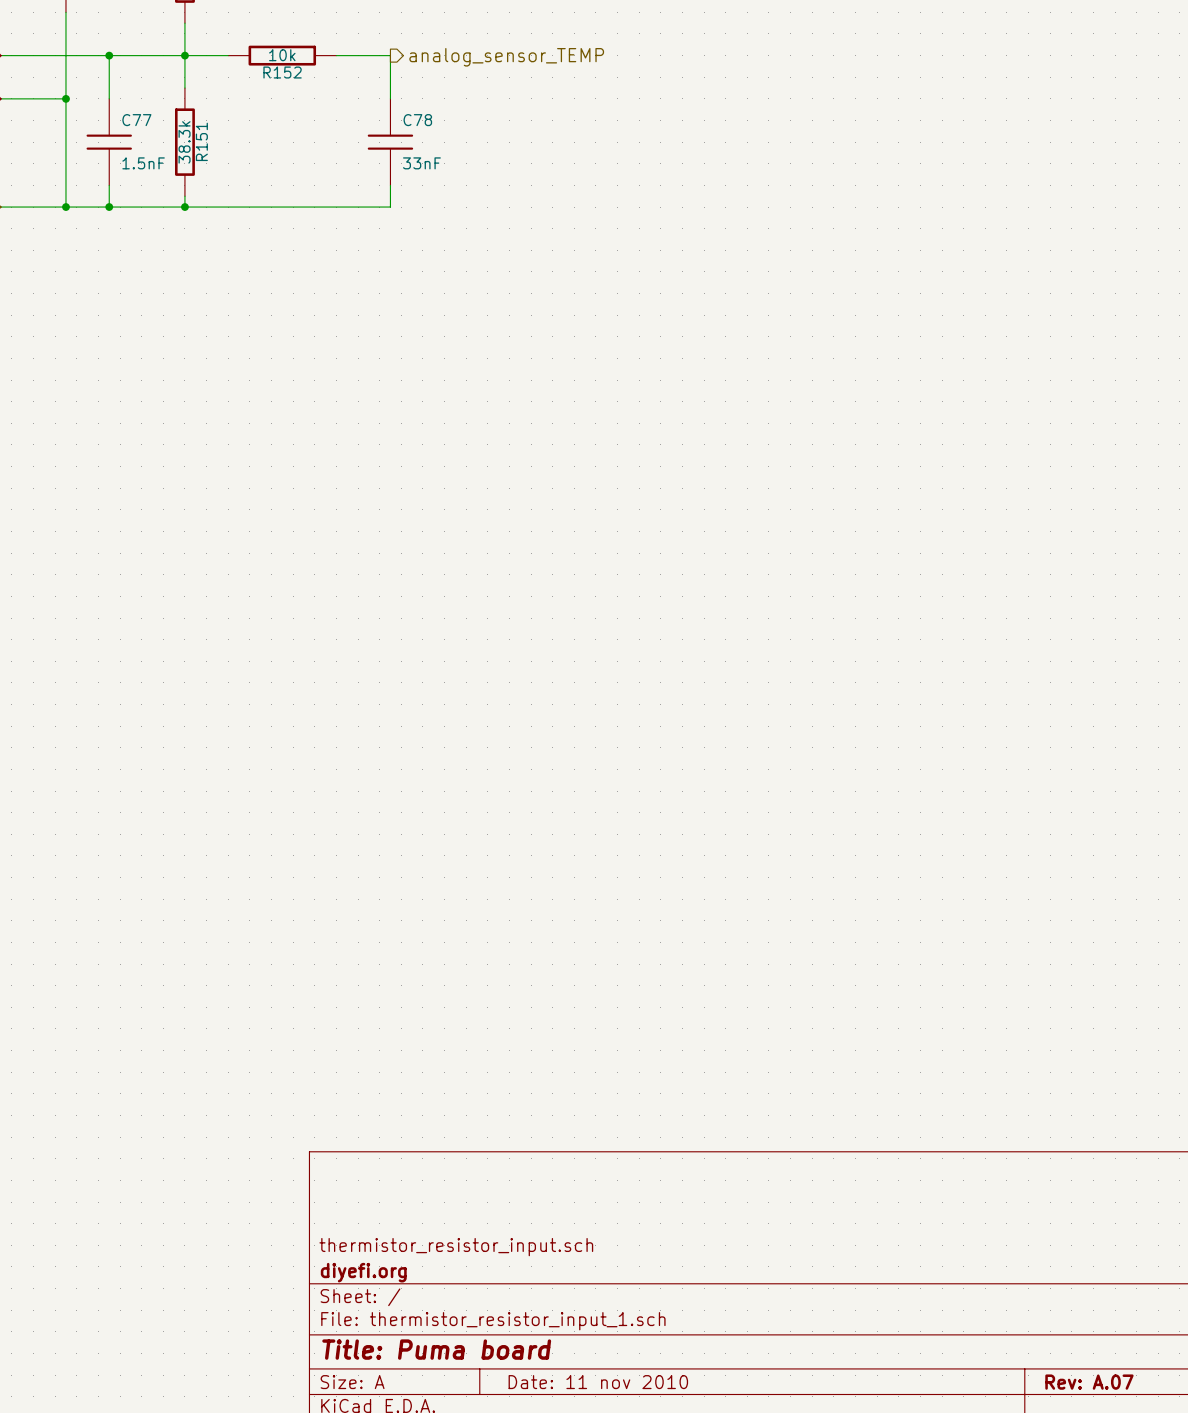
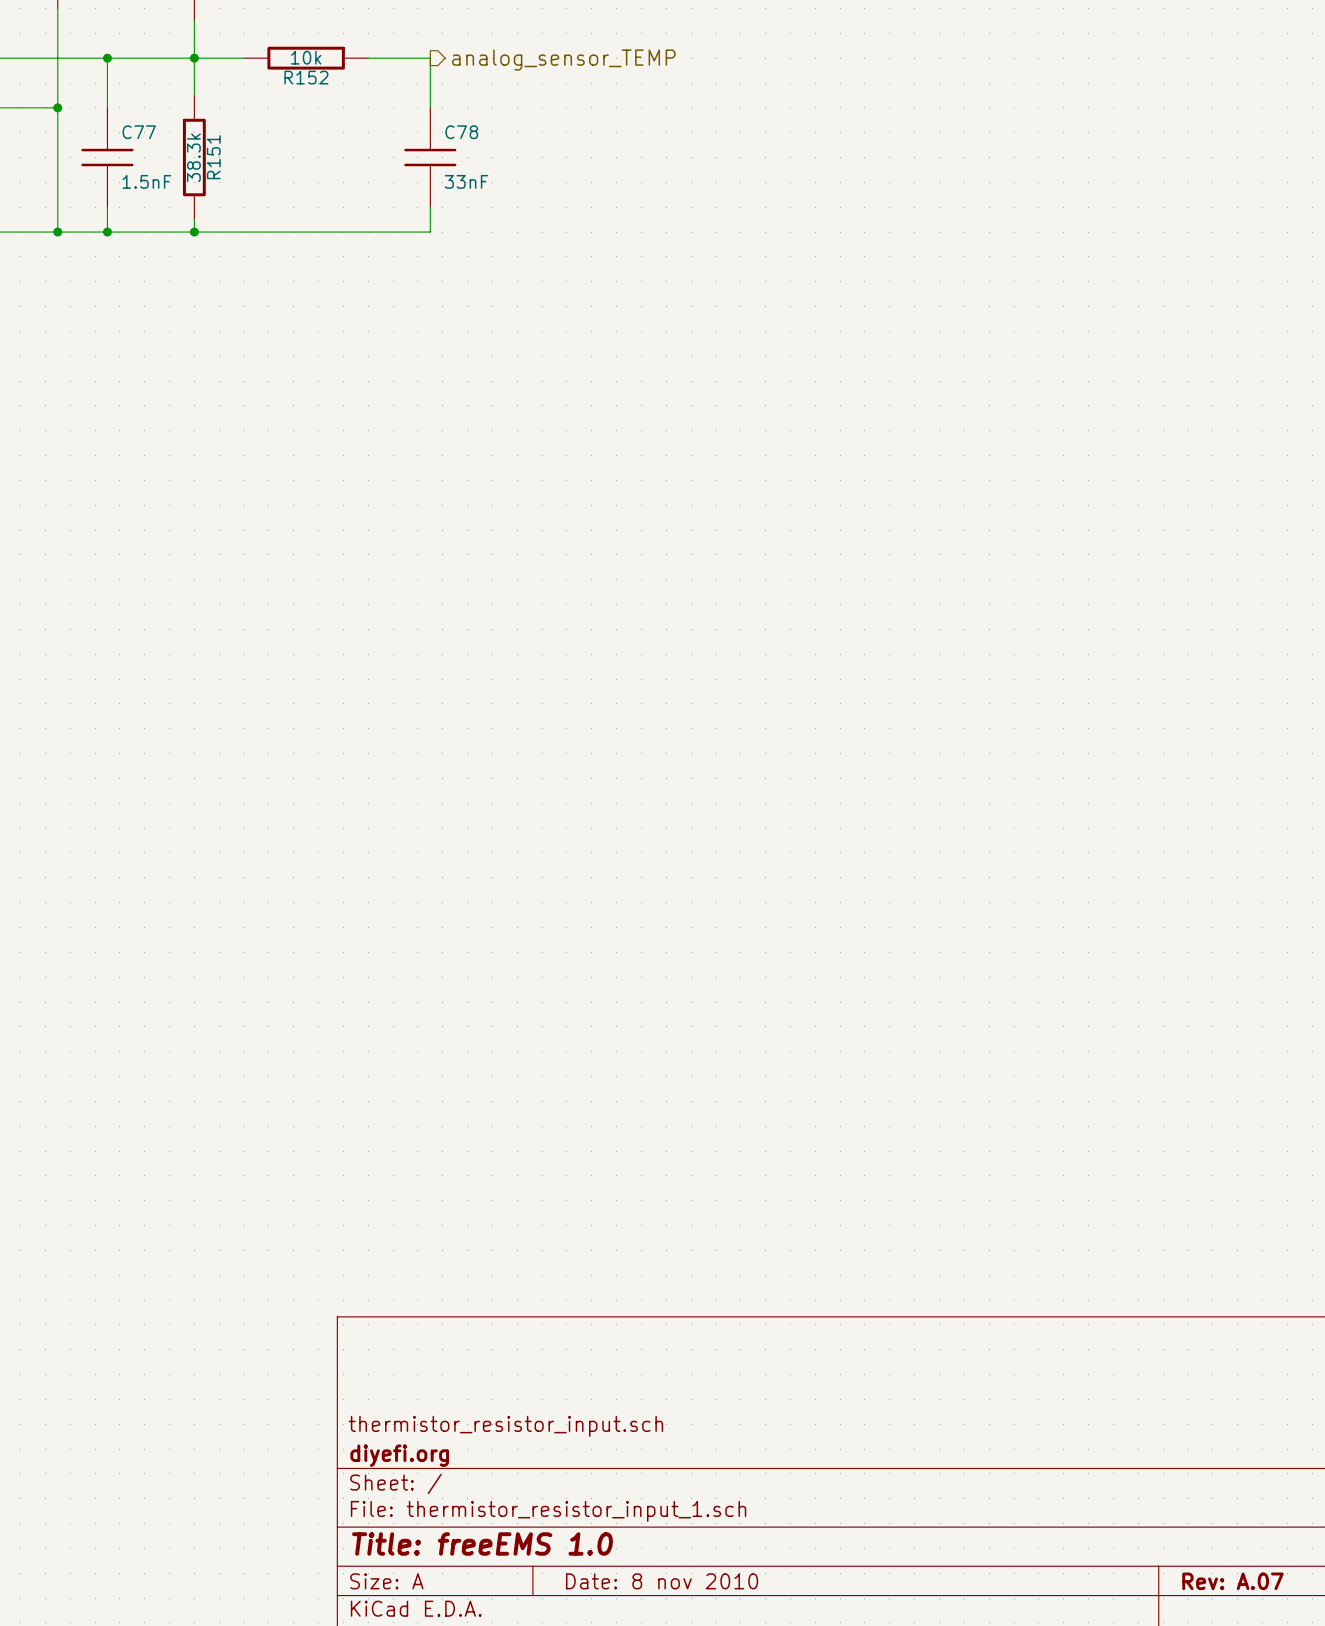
title block: Title: Puma board (436, 1349) -> Title: freeEMS 1.0 (482, 1543)
title block: Date: 11 nov 2010 (598, 1382) -> Date: 8 nov 2010 (662, 1581)

